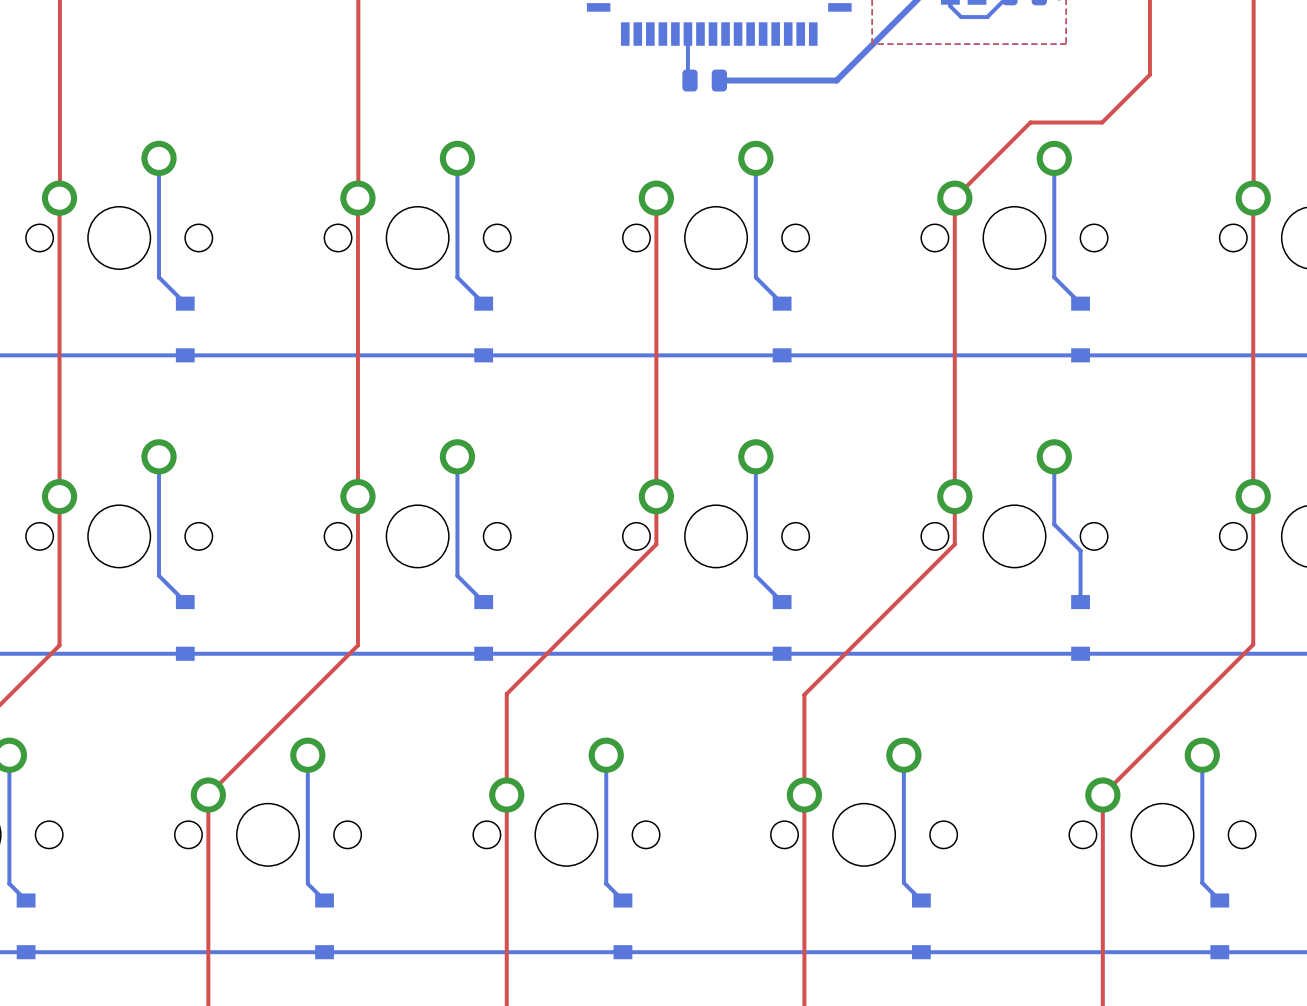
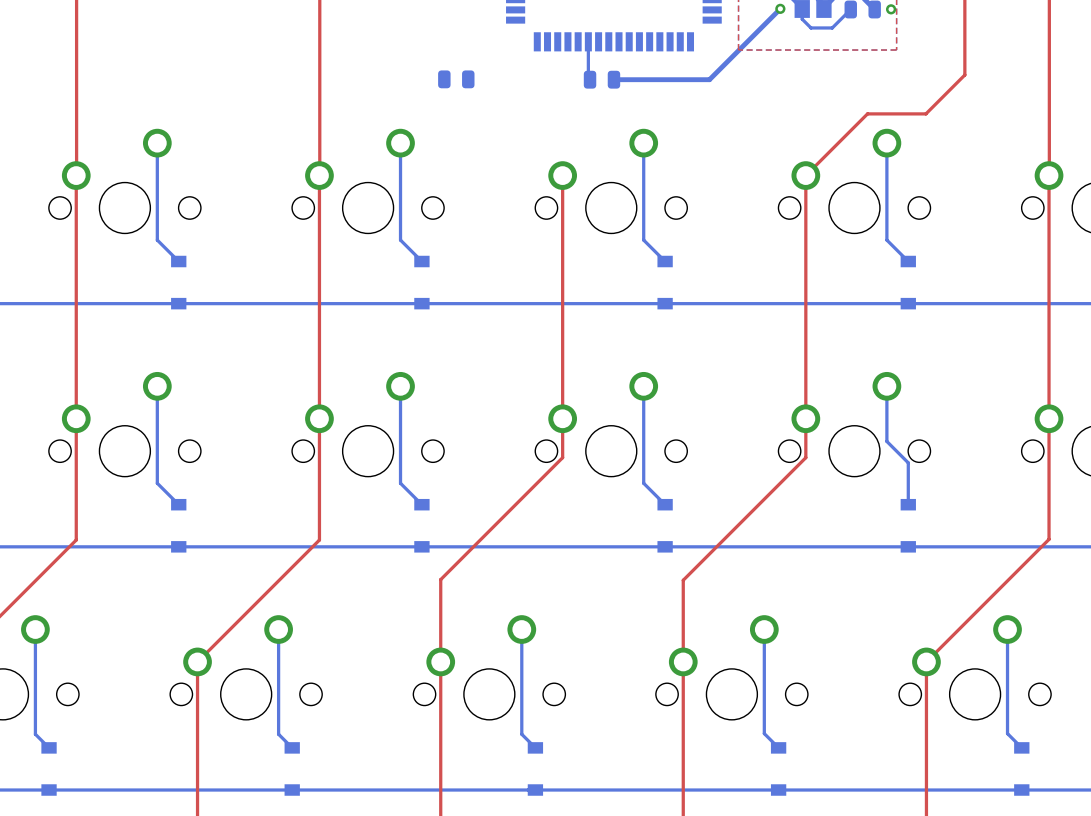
part: none -> (456, 79)

